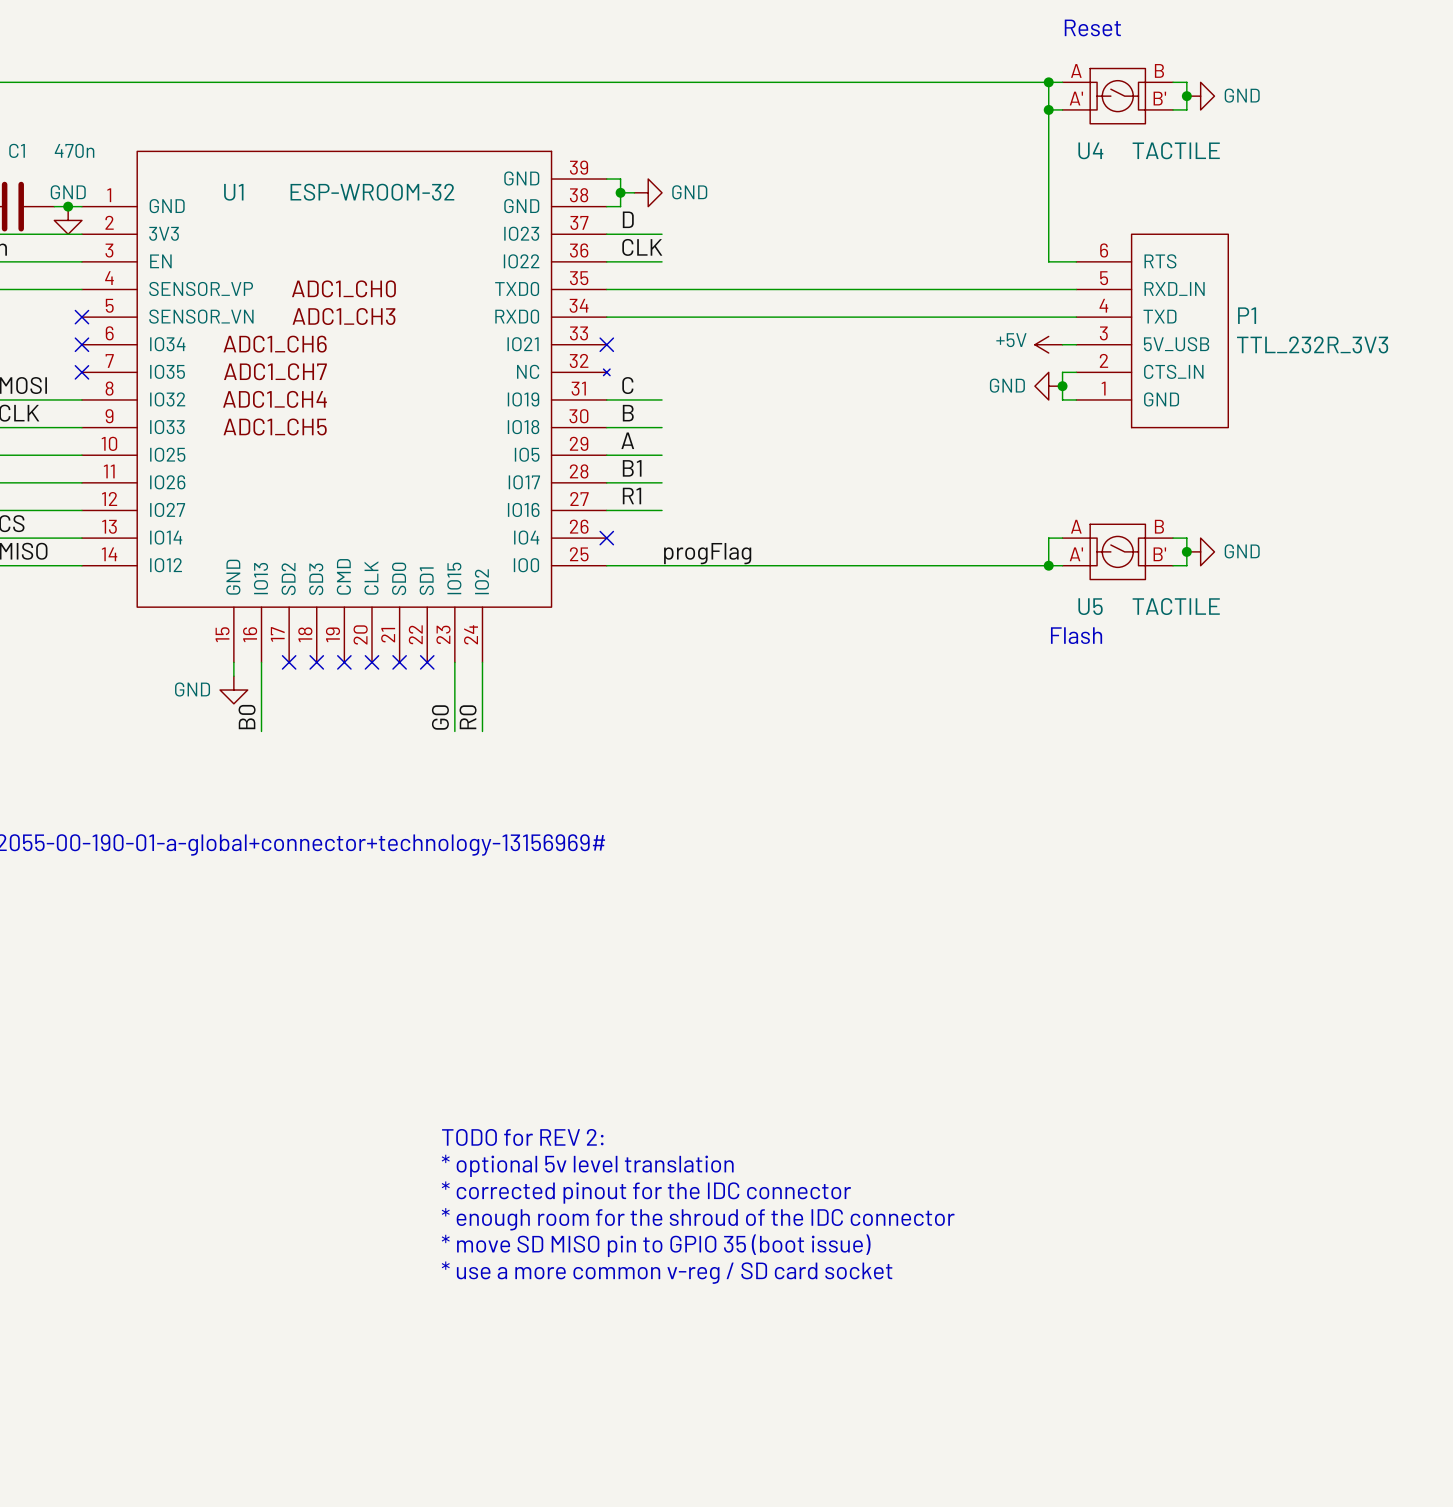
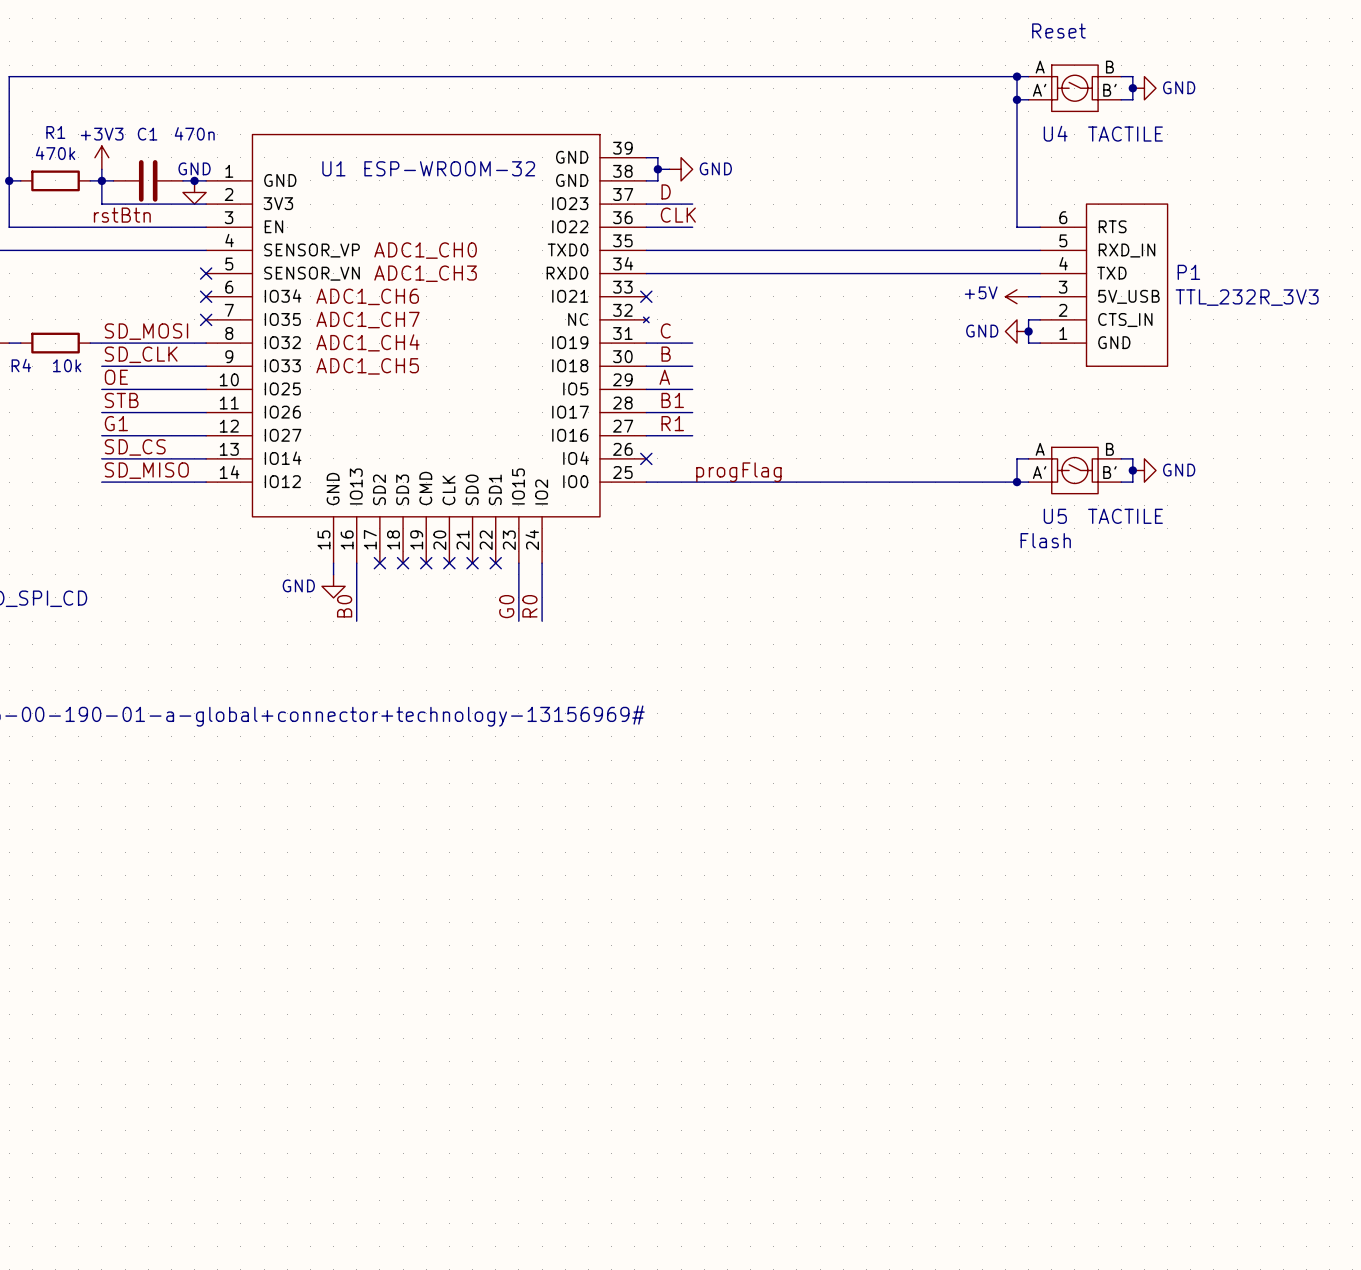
text: TODO for REV 2: (522, 1137) -> none
text: * optional 5v level translation (587, 1165) -> none
text: * corrected pinout for the IDC connector (646, 1192) -> none
text: * enough room for the shroud of the IDC connector (698, 1219) -> none
text: * move SD MISO pin to GPIO 35 (boot issue) (656, 1245) -> none
text: * use a more common v-reg / SD card socket (667, 1272) -> none

